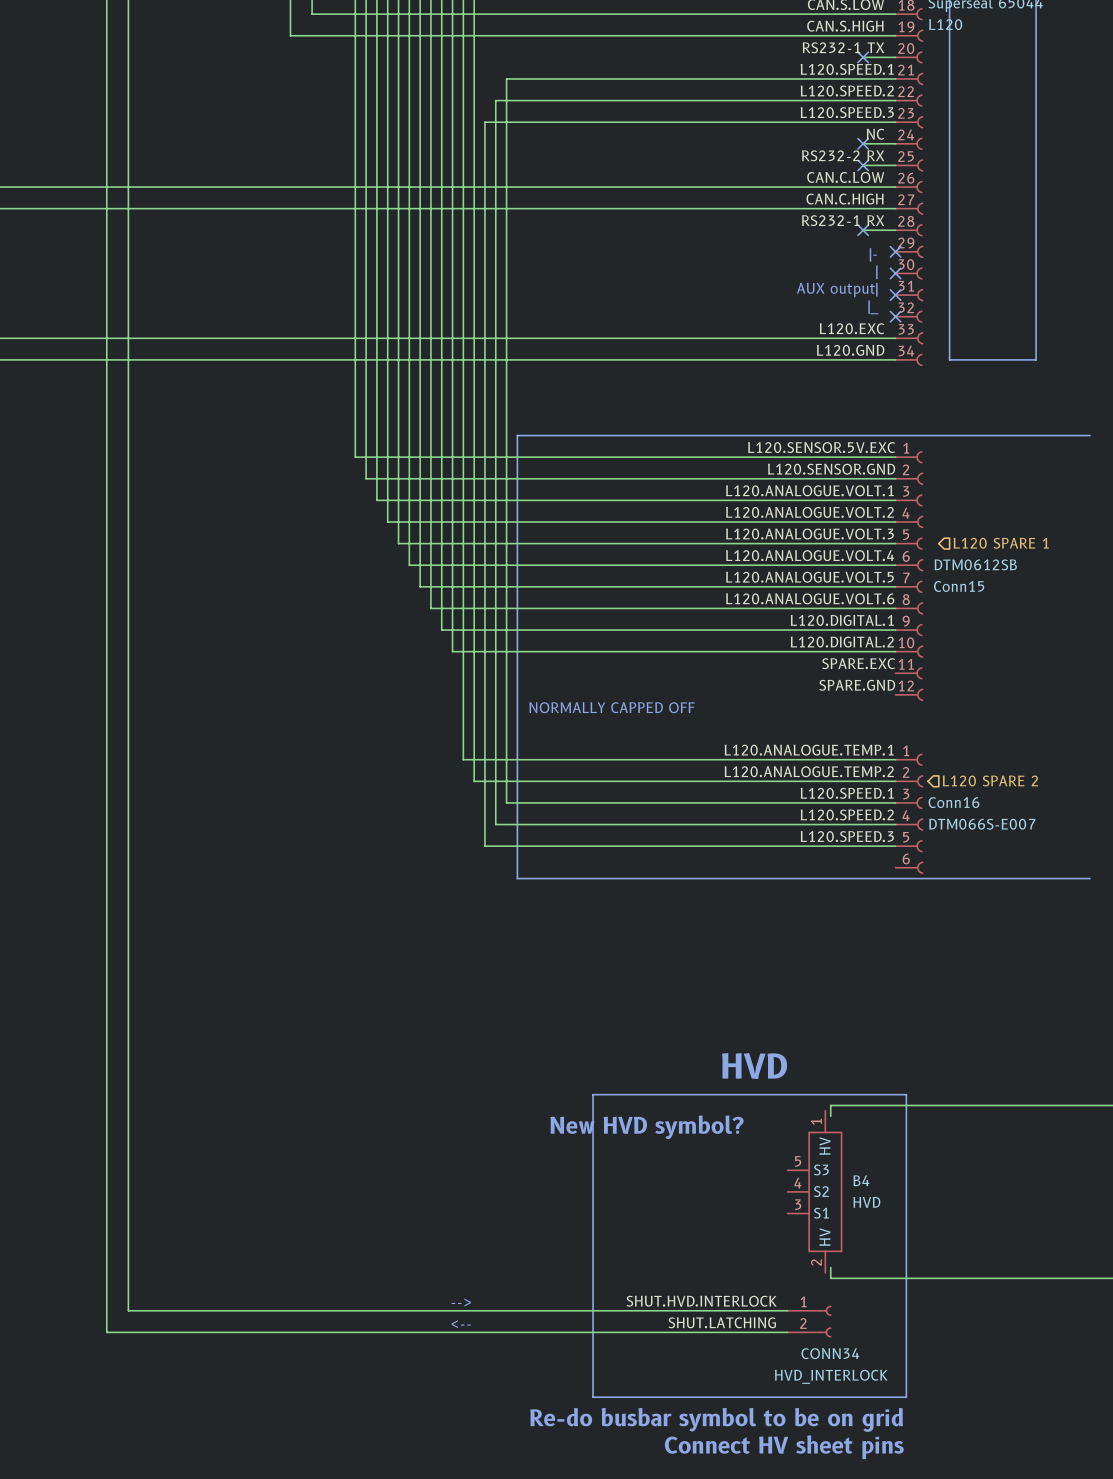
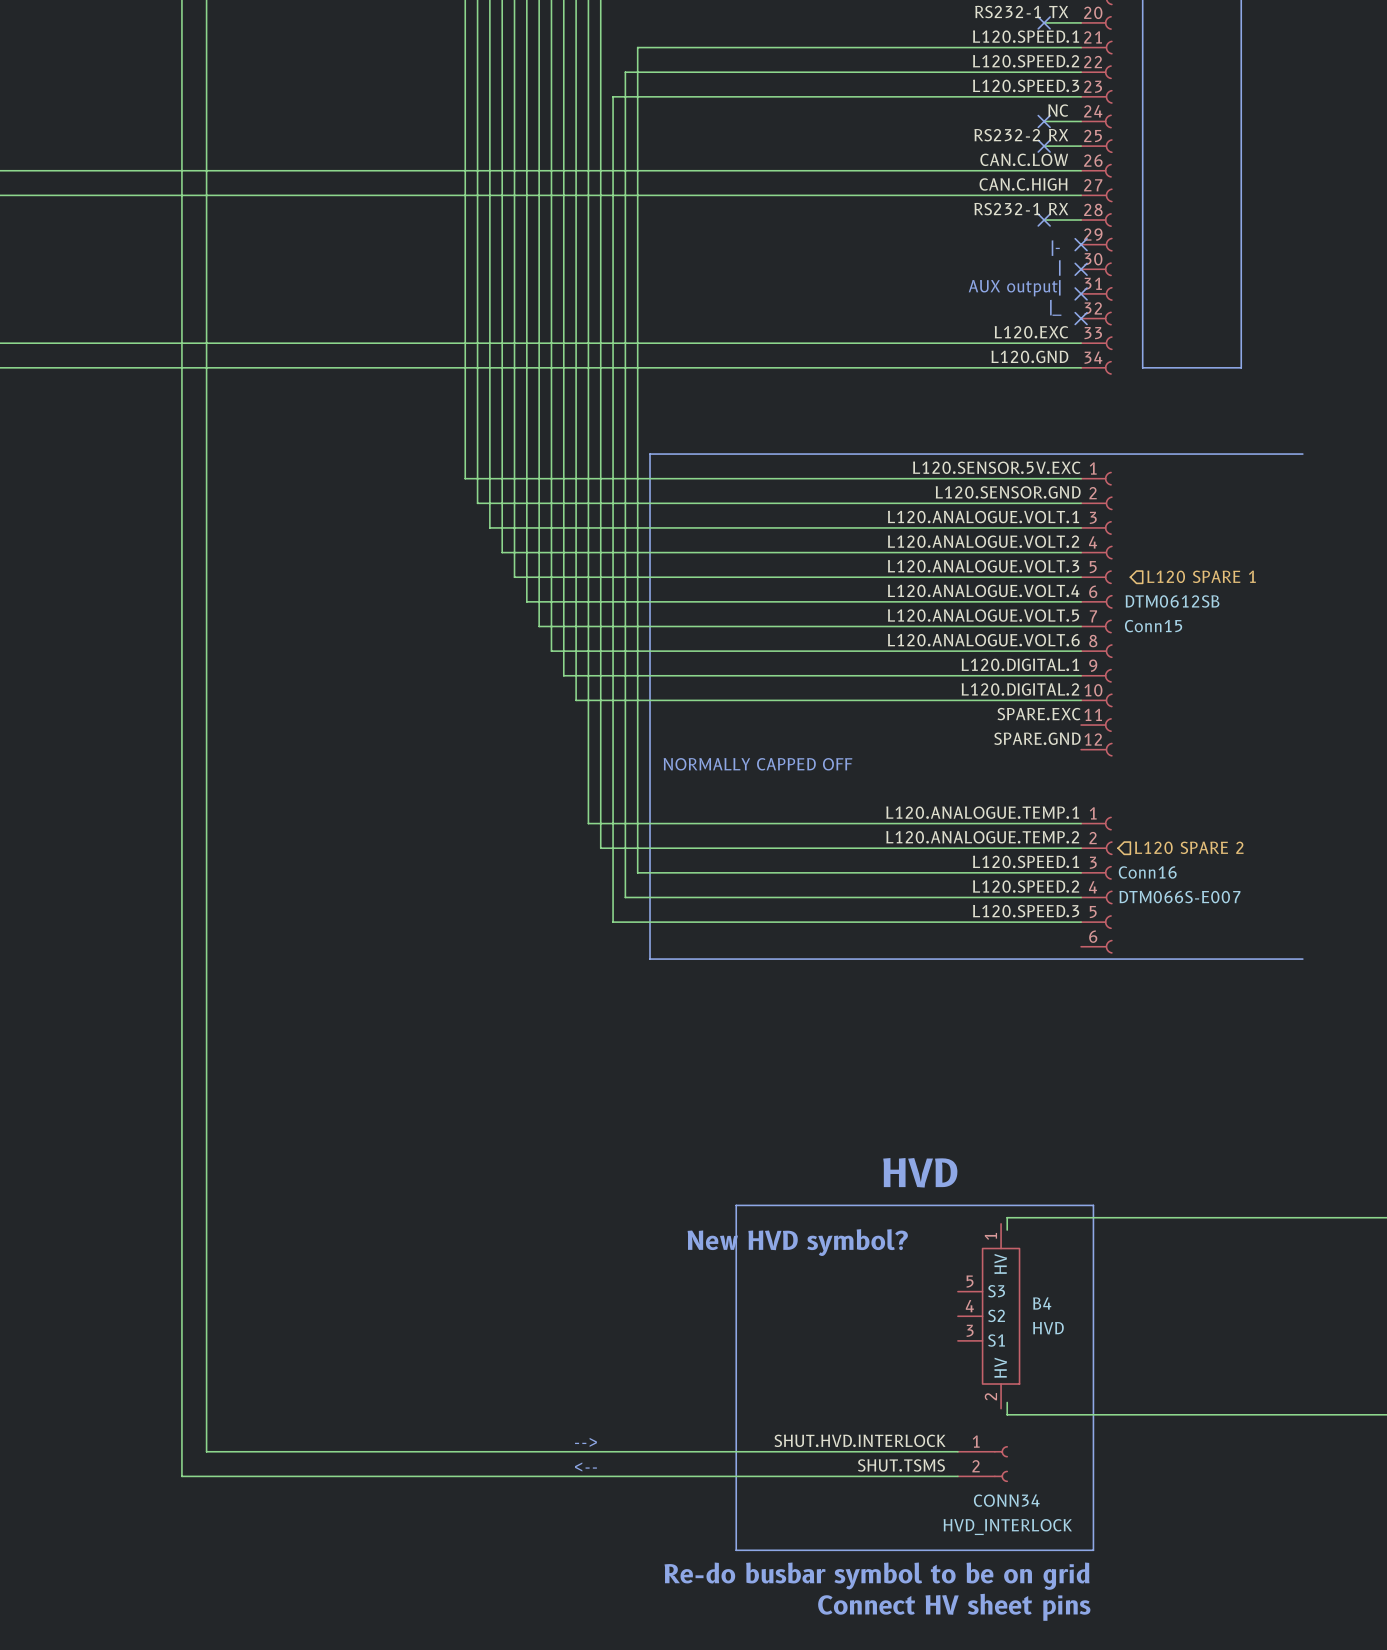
label: SHUT.LATCHING (722, 1322) -> SHUT.TSMS (901, 1465)

